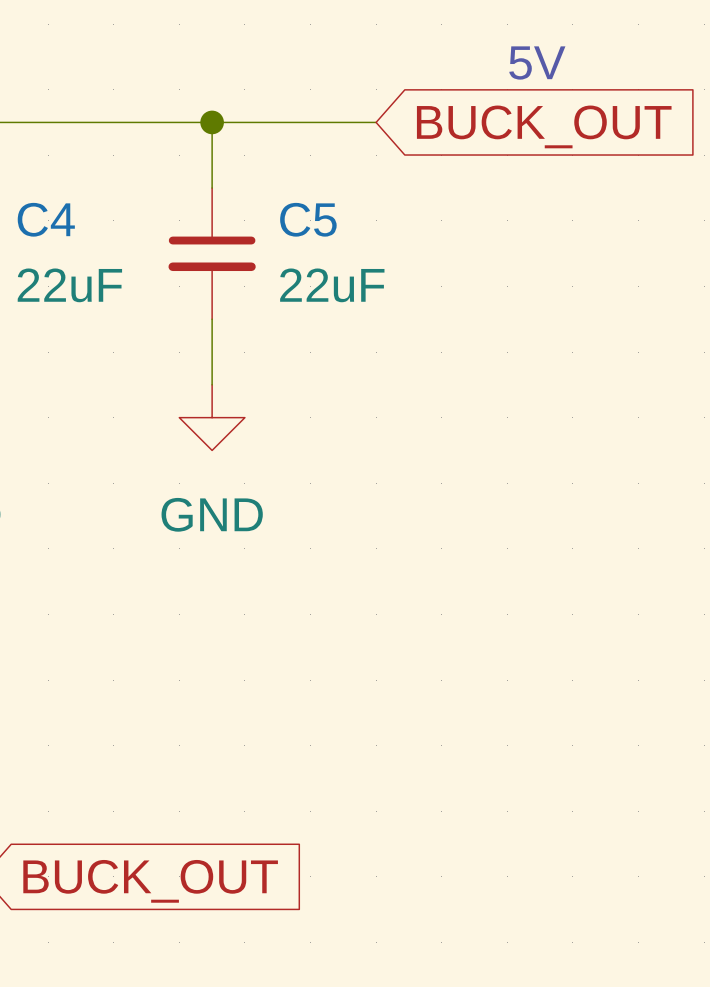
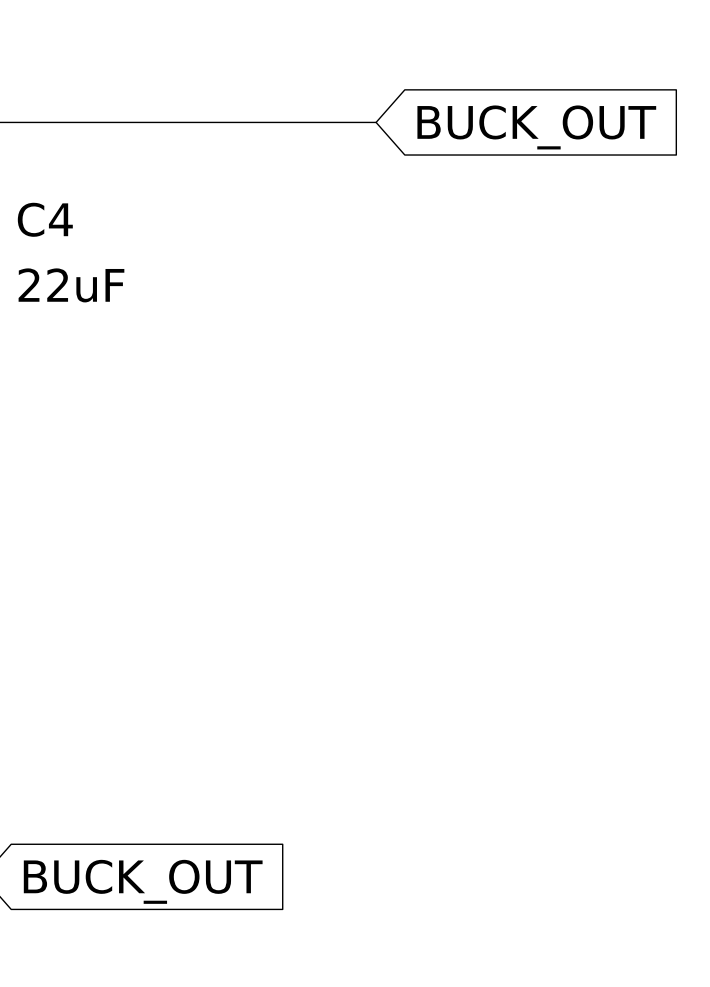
text: 5V (537, 63) -> none
wire: (212, 122) (212, 188) -> none
junction: (212, 122) -> none
C5: 22uF (212, 253) -> none
wire: (212, 319) (212, 384) -> none
power symbol: GND (212, 417) -> none

